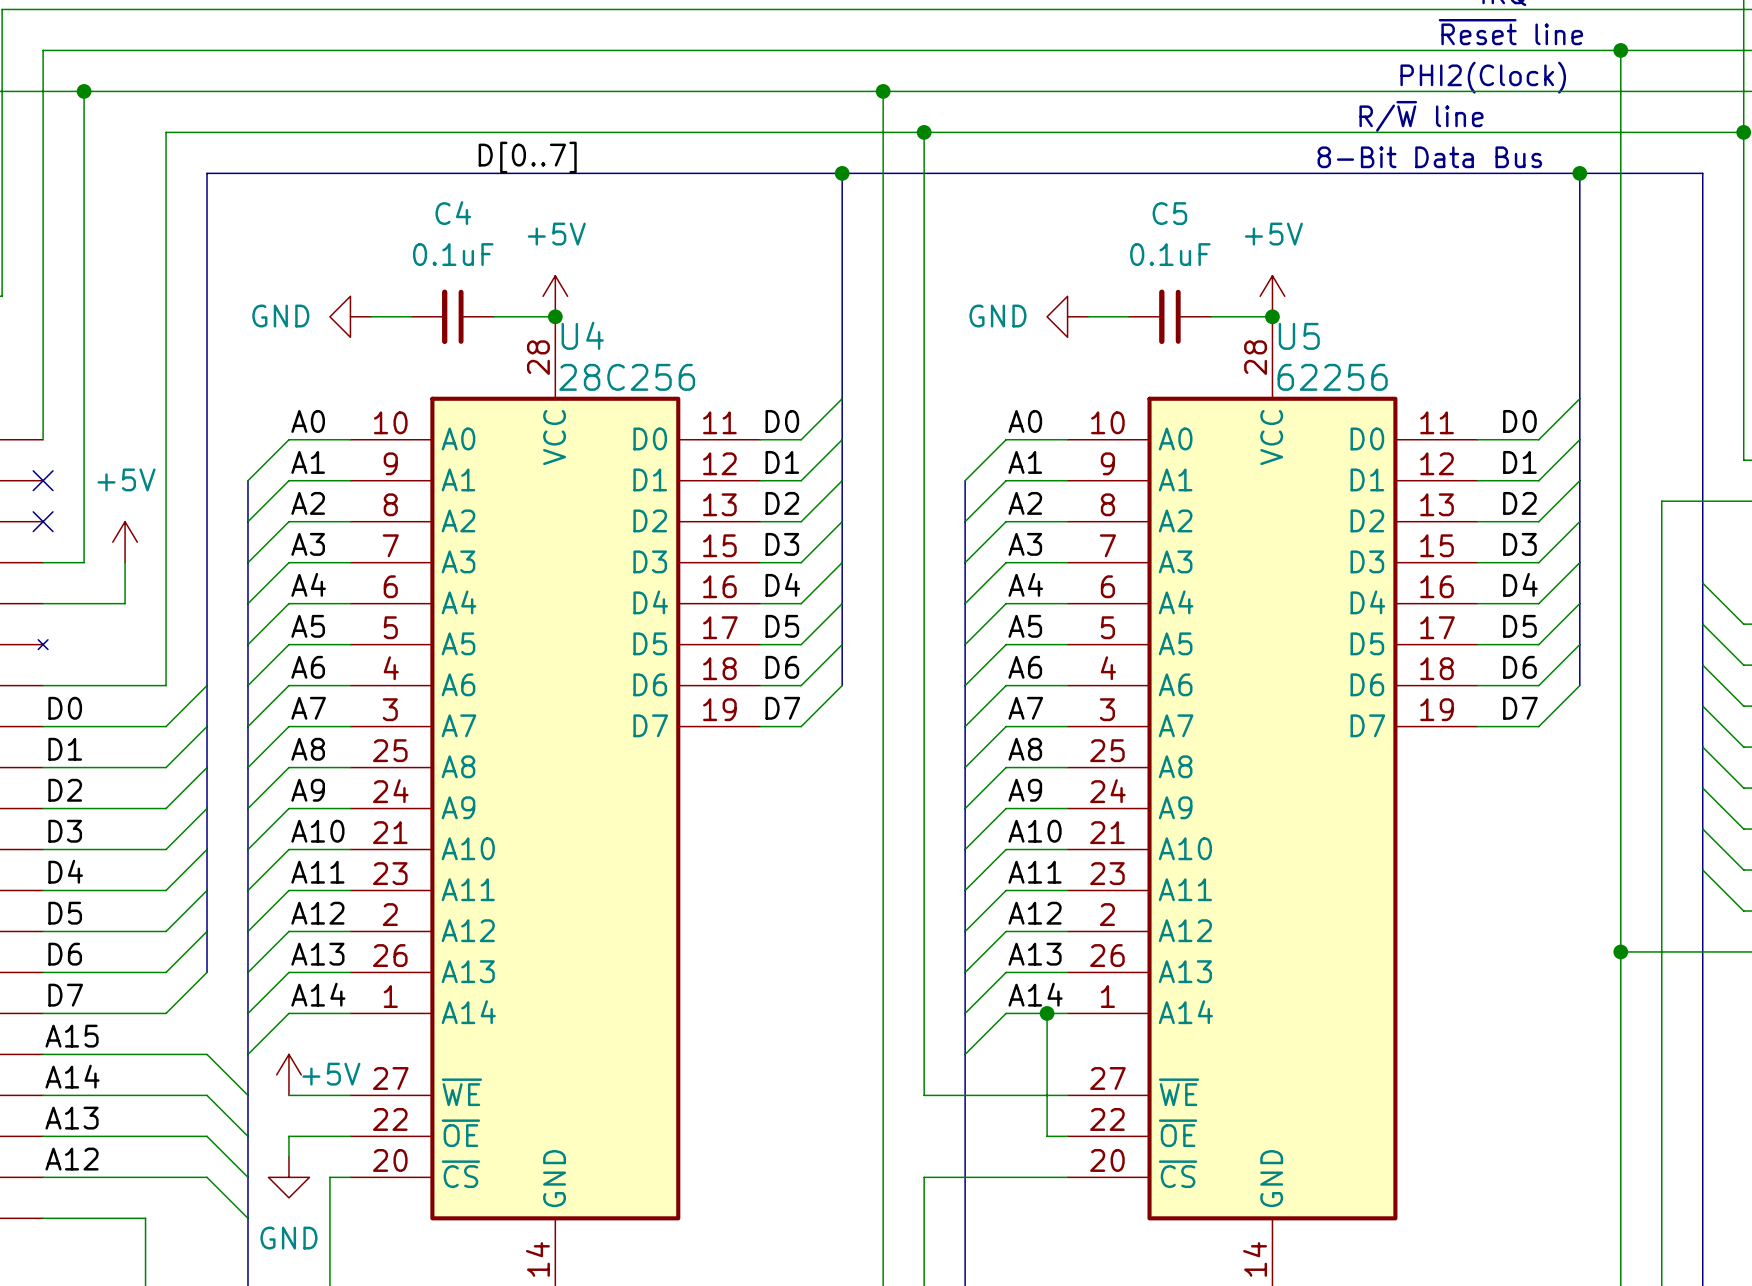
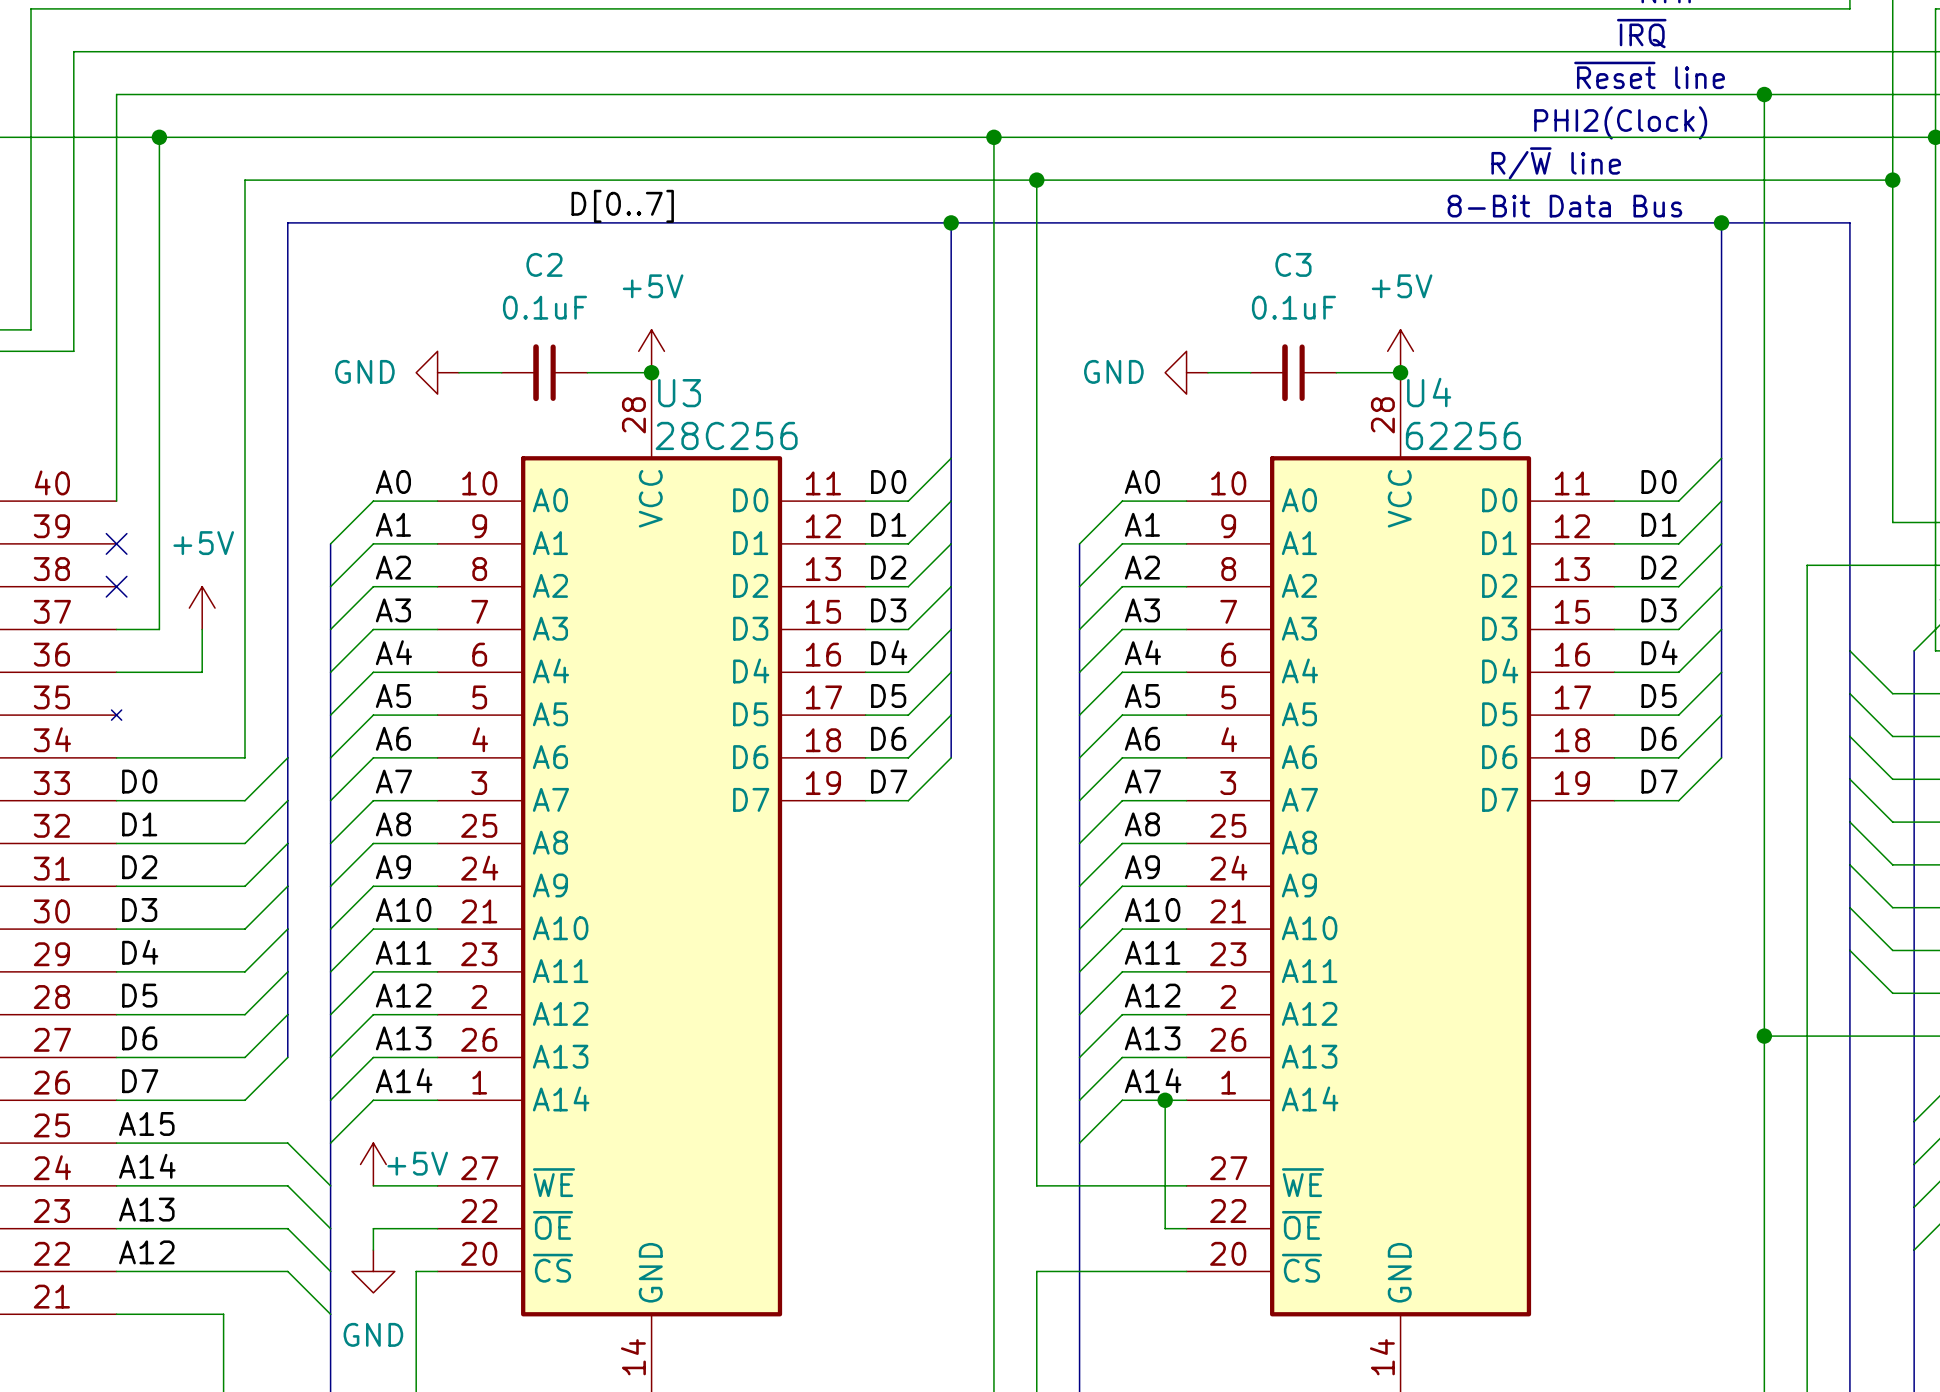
C4 name: C4 (453, 213) -> C2 (544, 264)
C5 name: C5 (1169, 213) -> C3 (1293, 264)
U4 name: U4 (582, 335) -> U3 (679, 393)
U5 name: U5 (1299, 336) -> U4 (1429, 392)

